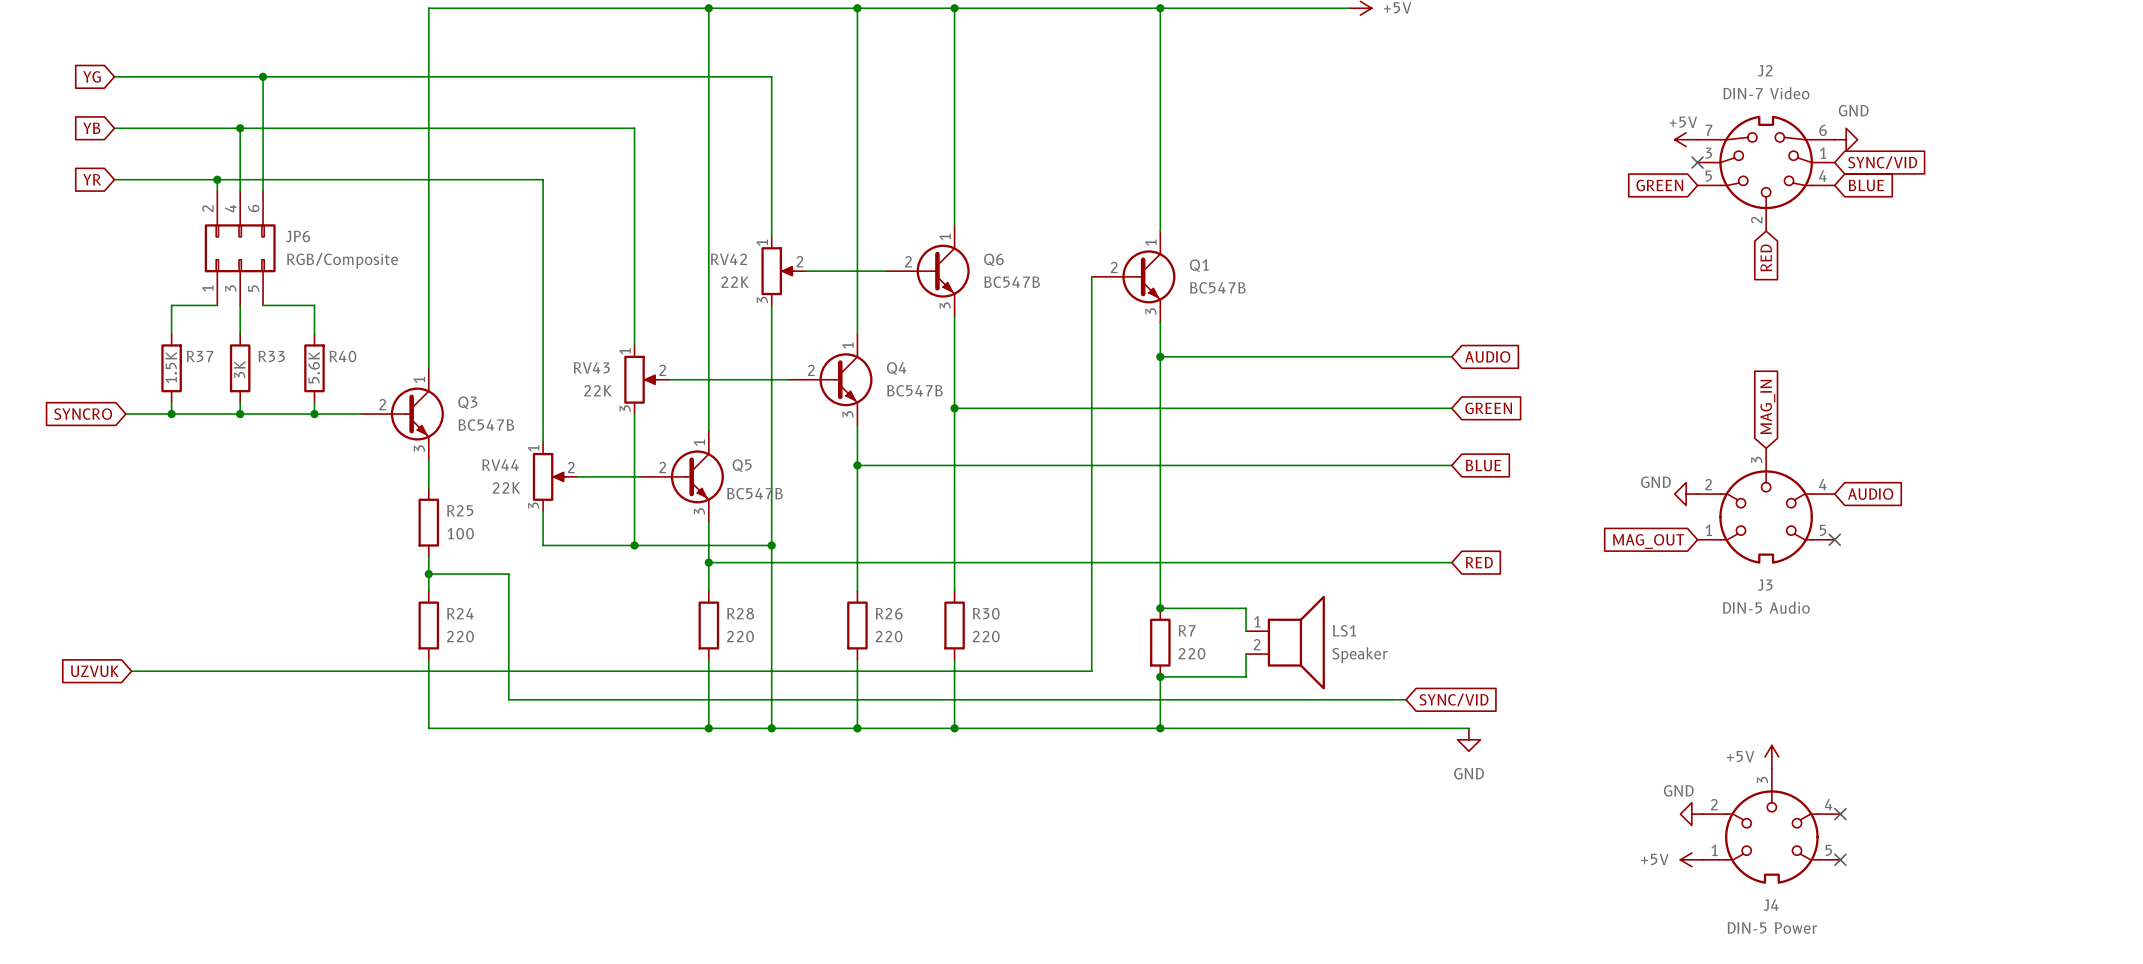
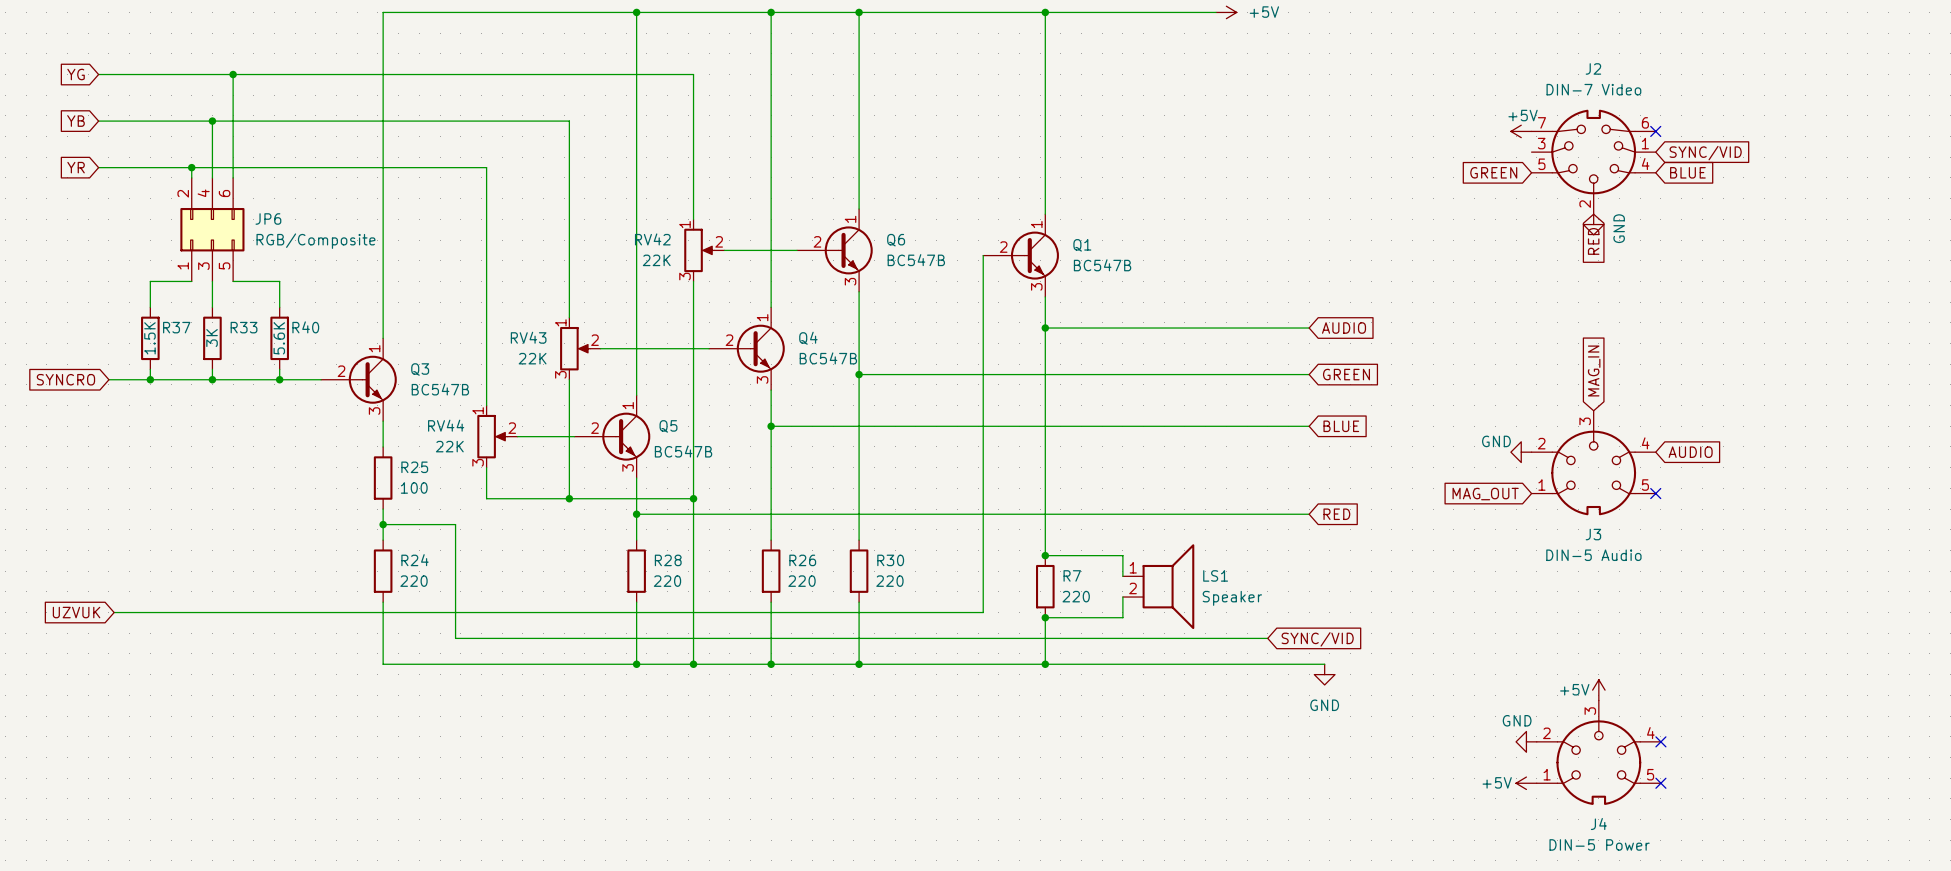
no-connect mark: none -> (1655, 131)
power symbol rotation: 0° (1846, 139) -> 90° clockwise (1593, 224)
power symbol position: GND (1846, 139) -> GND (1593, 224)
no-connect mark: (1697, 162) -> none

